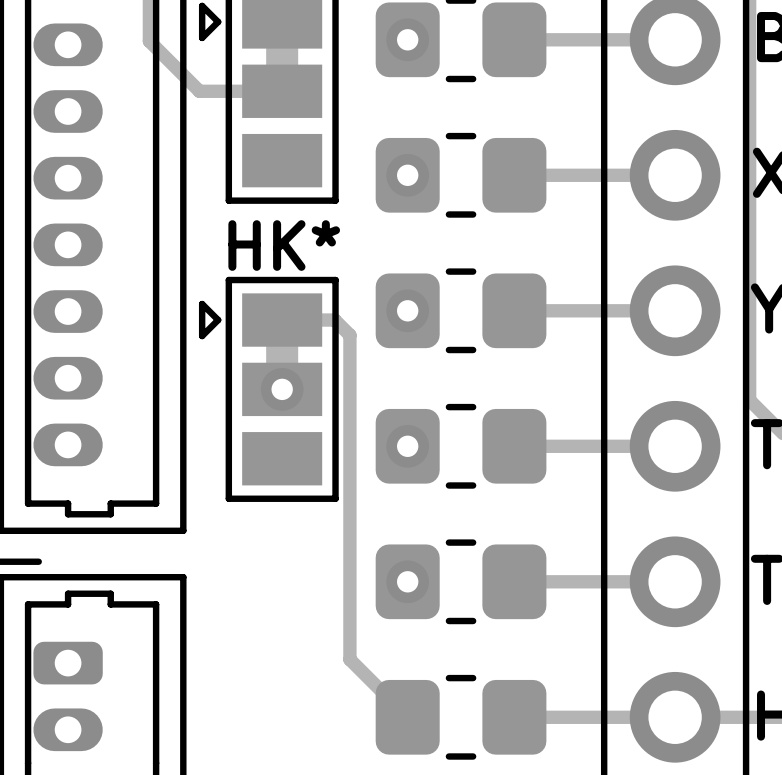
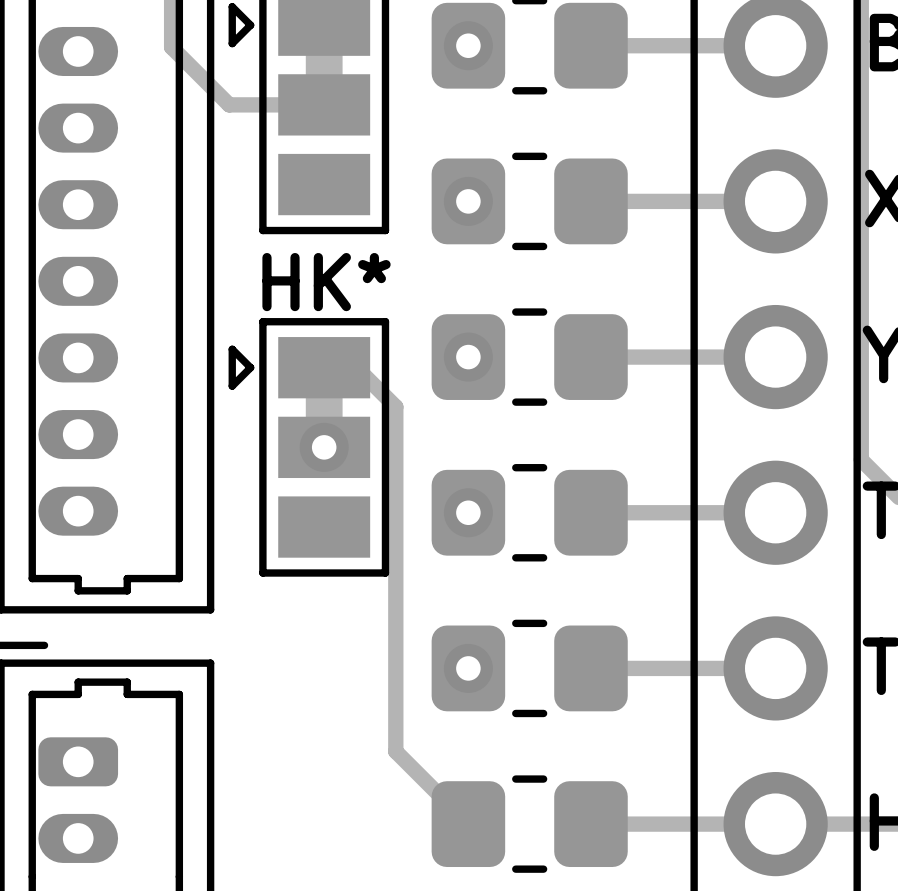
track: (310, 320) (334, 320) (349, 335) (349, 659) -> (356, 367) (395, 406) (395, 751) (402, 757)

